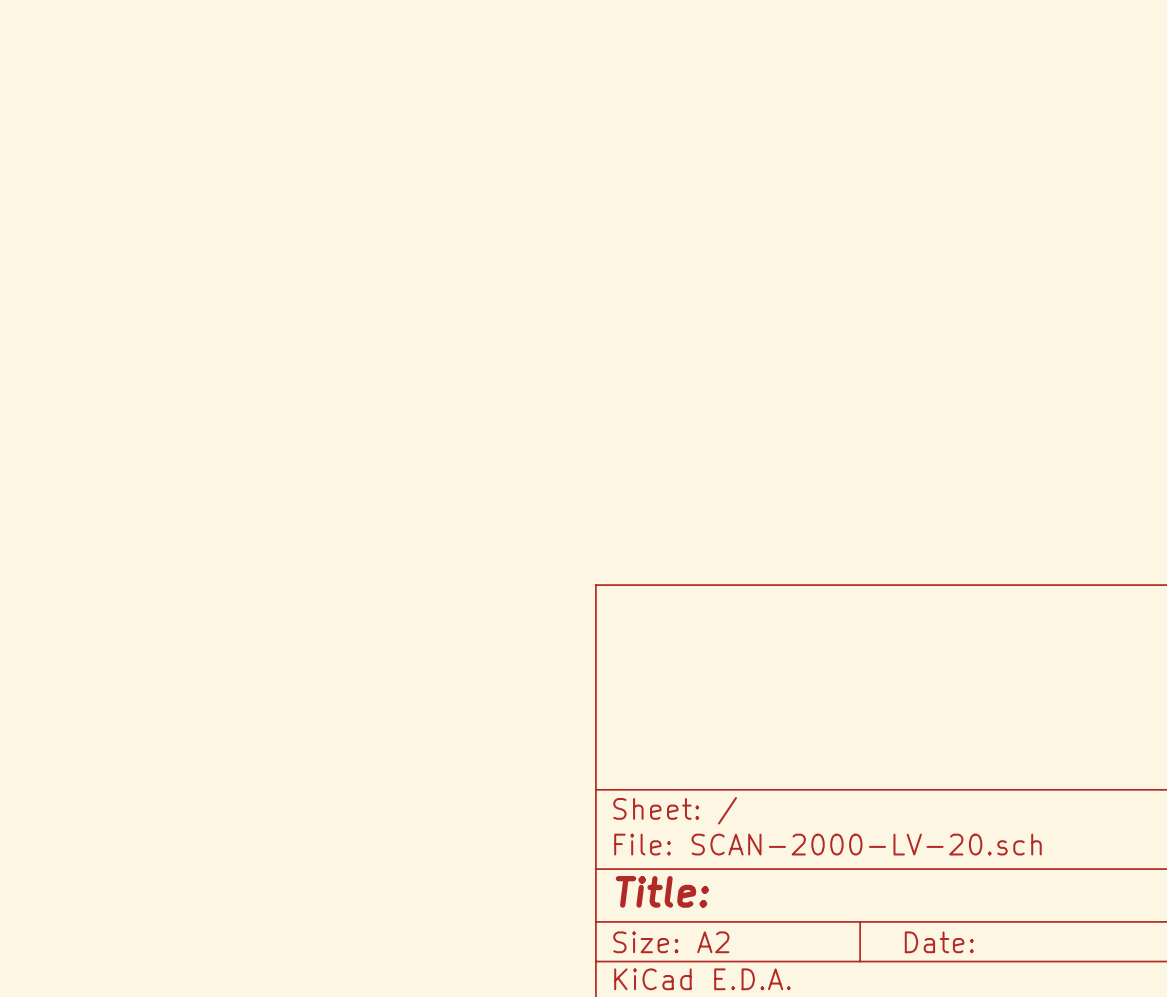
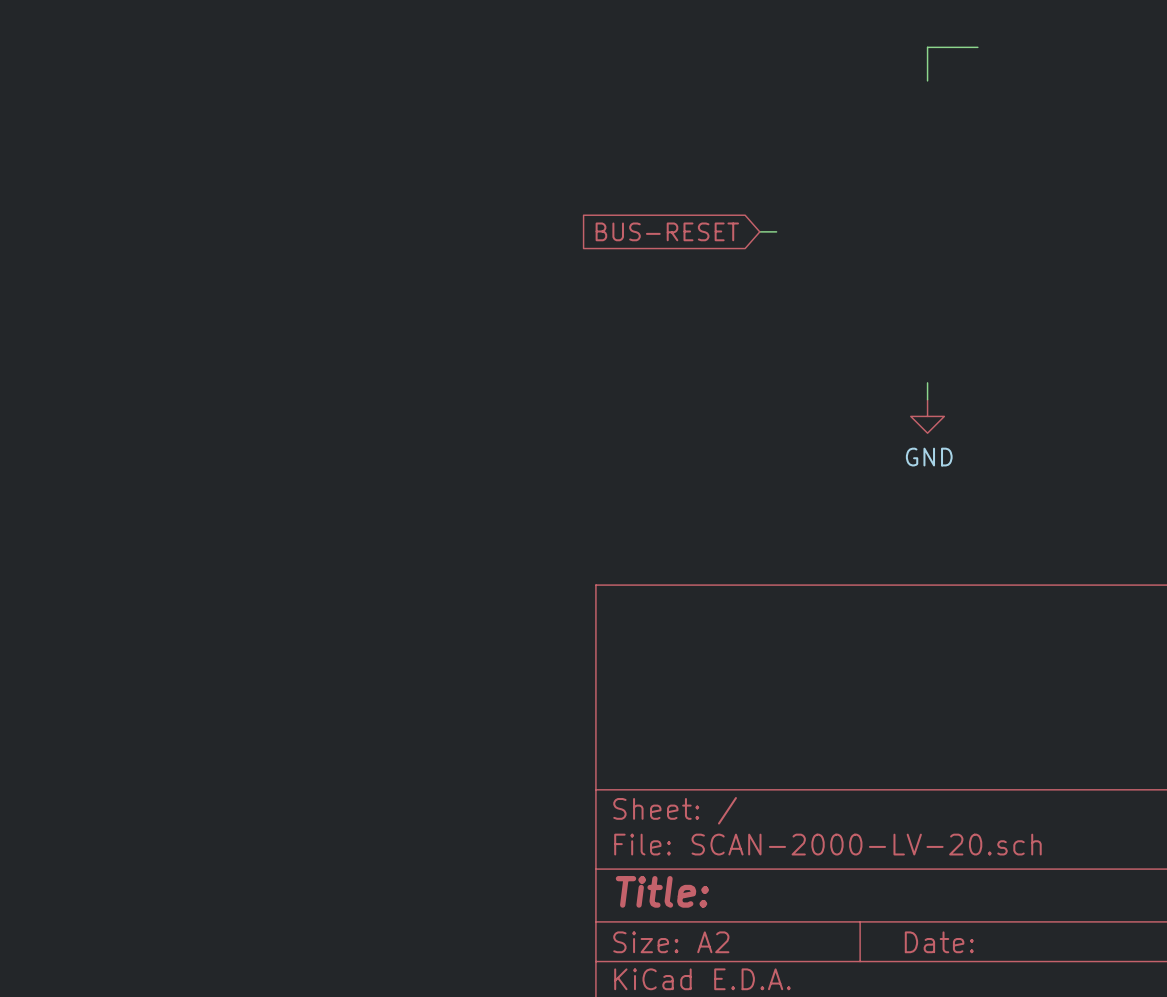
wire: none -> (977, 47) (927, 47) (927, 80)
global label: none -> BUS-RESET (667, 231)
wire: none -> (759, 231) (776, 231)
wire: none -> (927, 382) (927, 399)
power symbol: none -> GND (927, 416)

